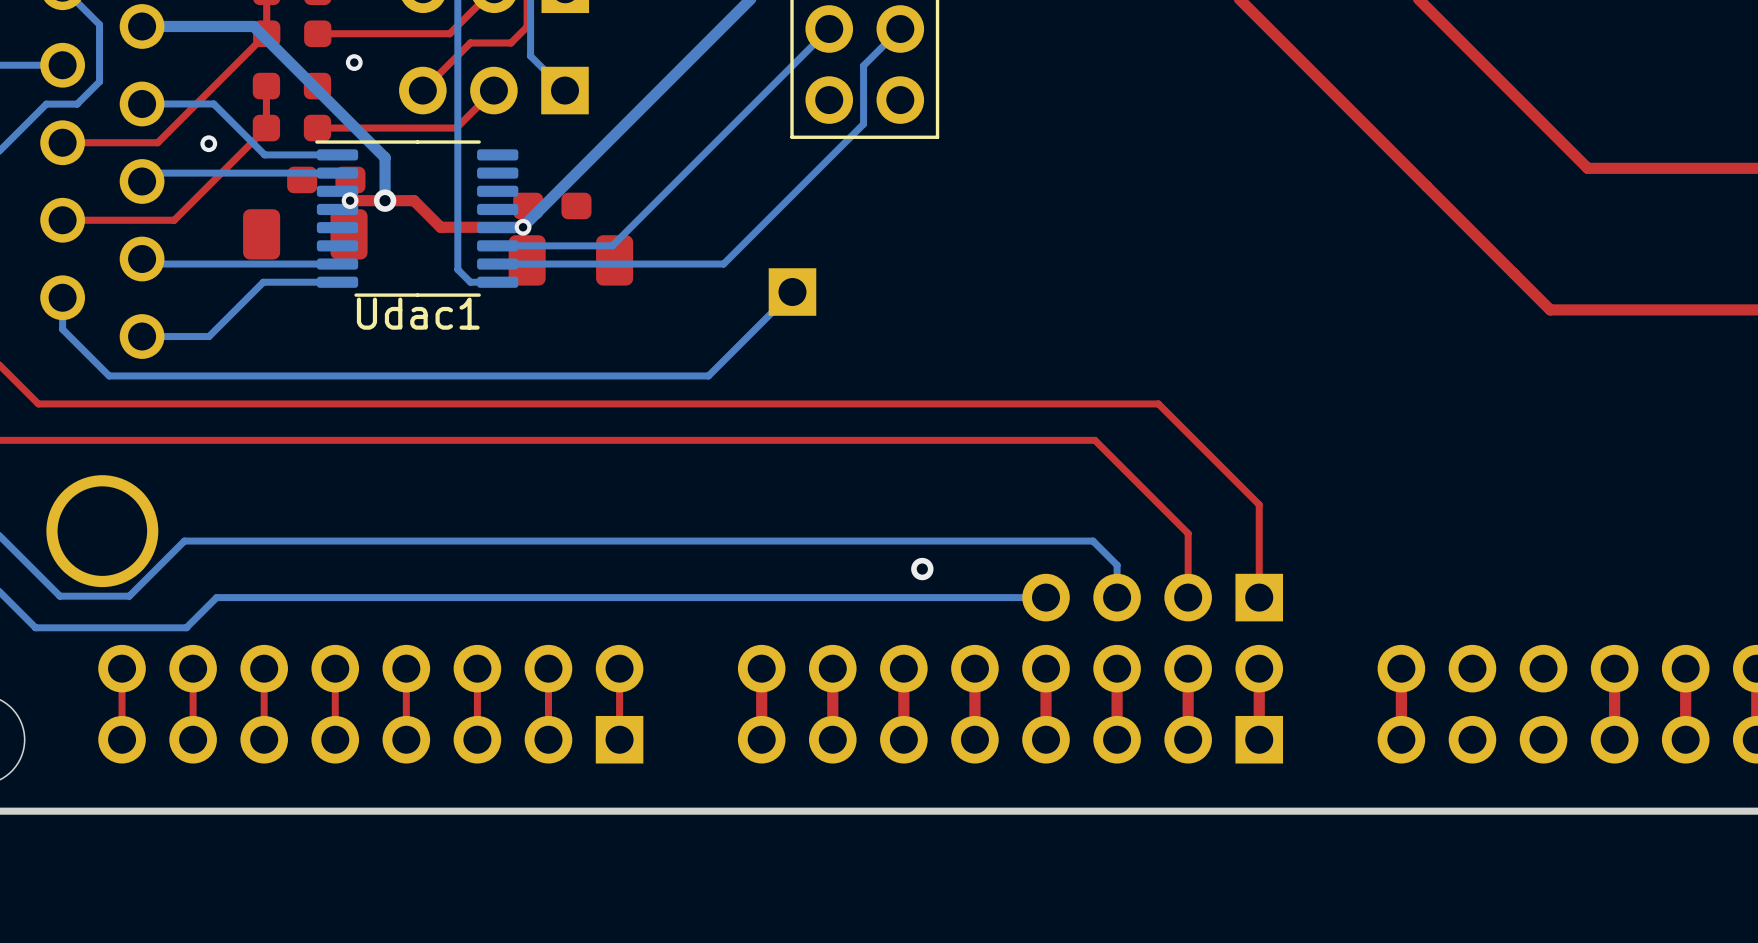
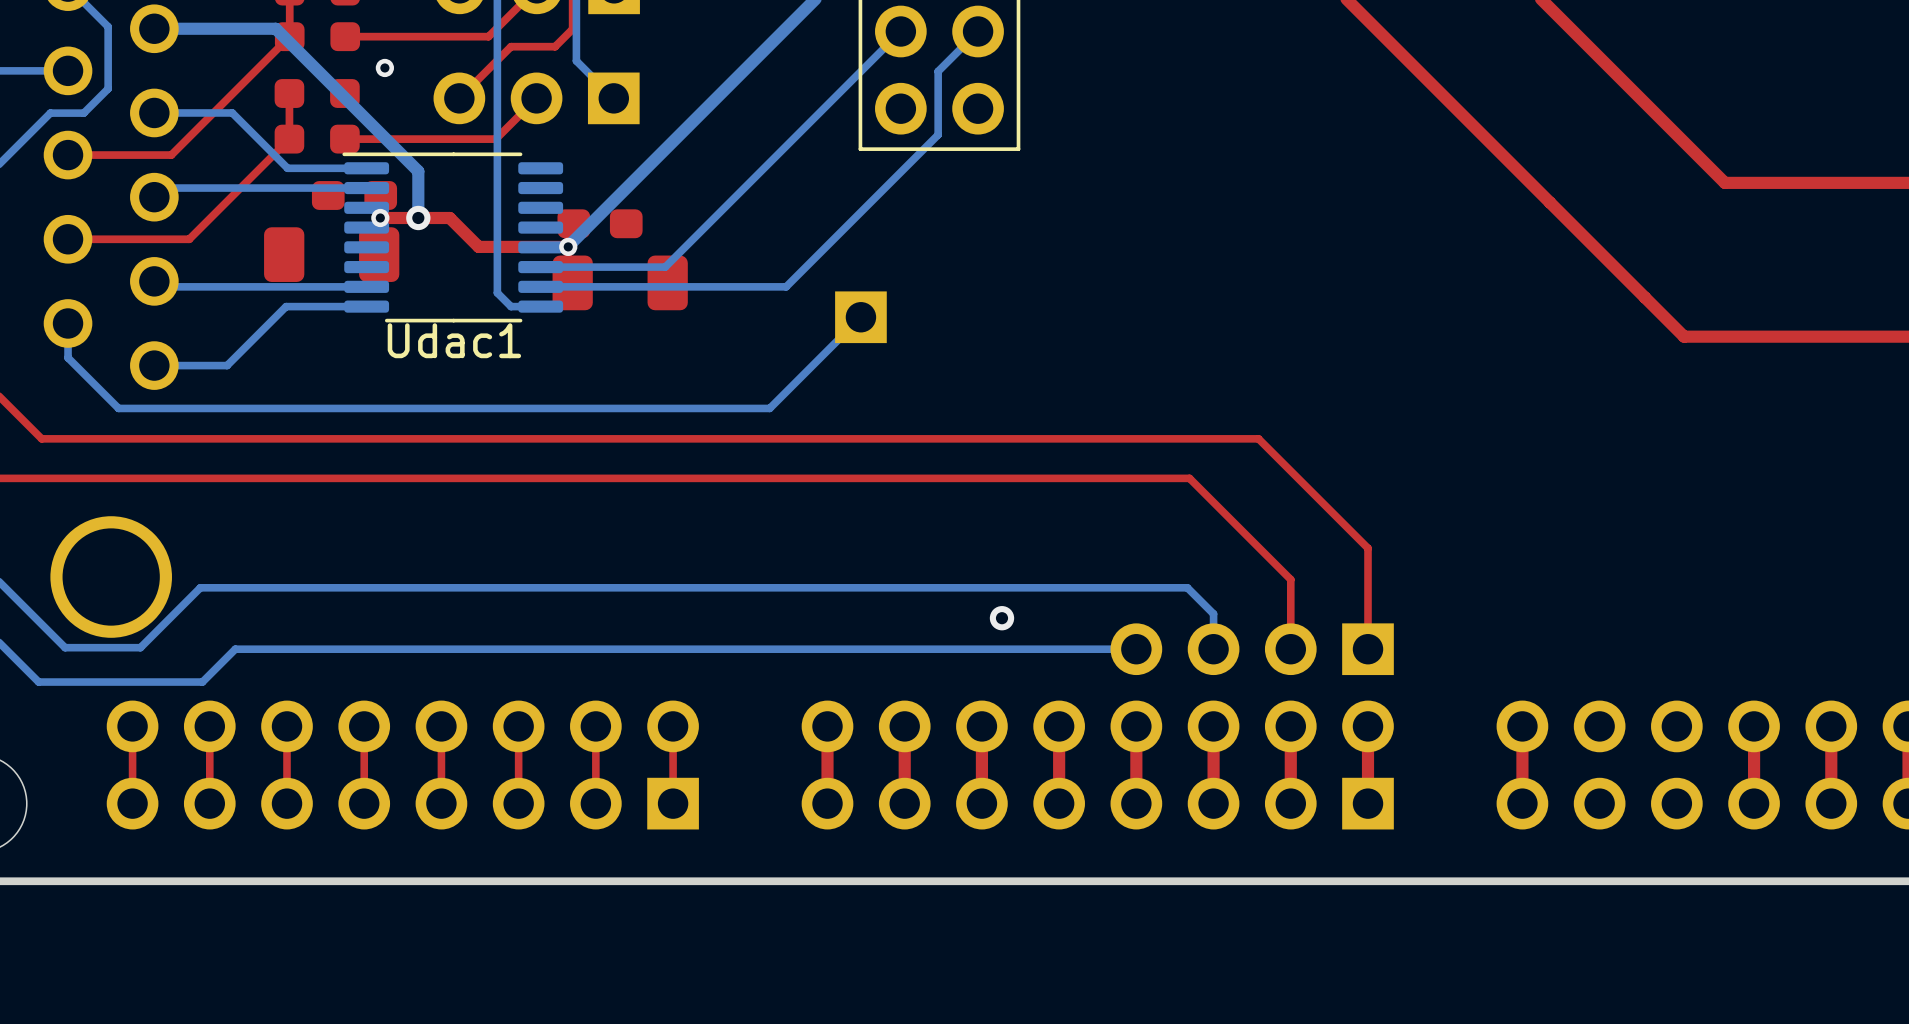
via: (208, 143) -> none

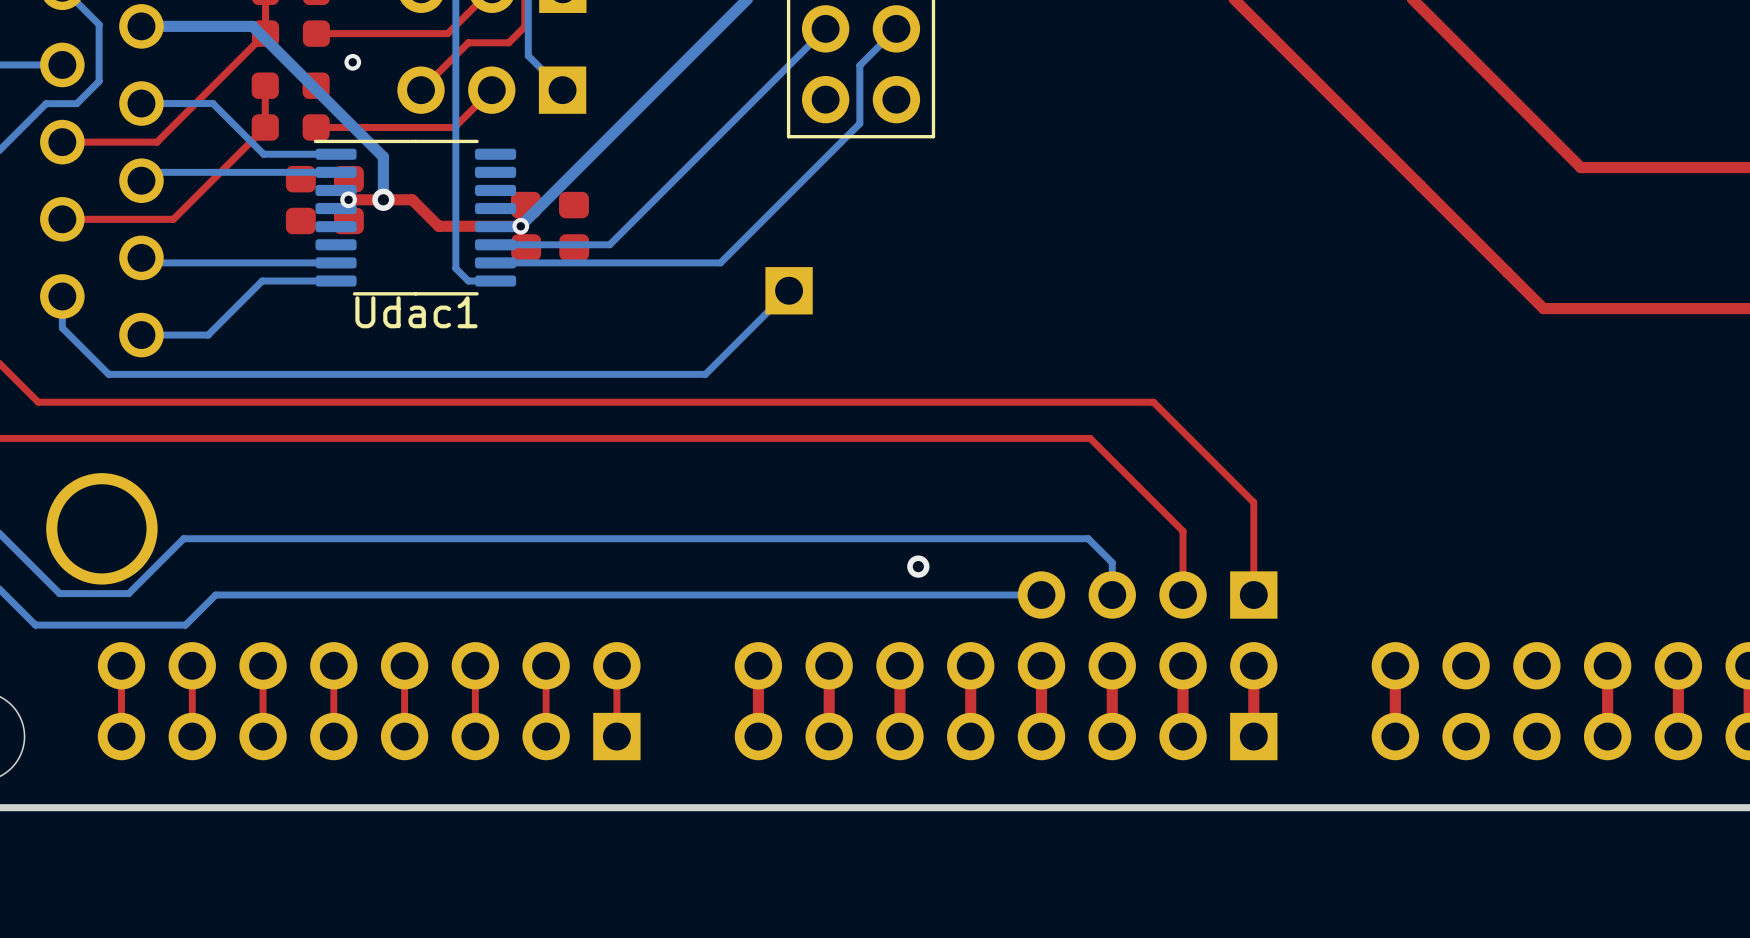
part footprint: [264, 227, 400, 282] -> [285, 207, 364, 235]
part footprint: [552, 255, 688, 311] -> [511, 234, 590, 261]

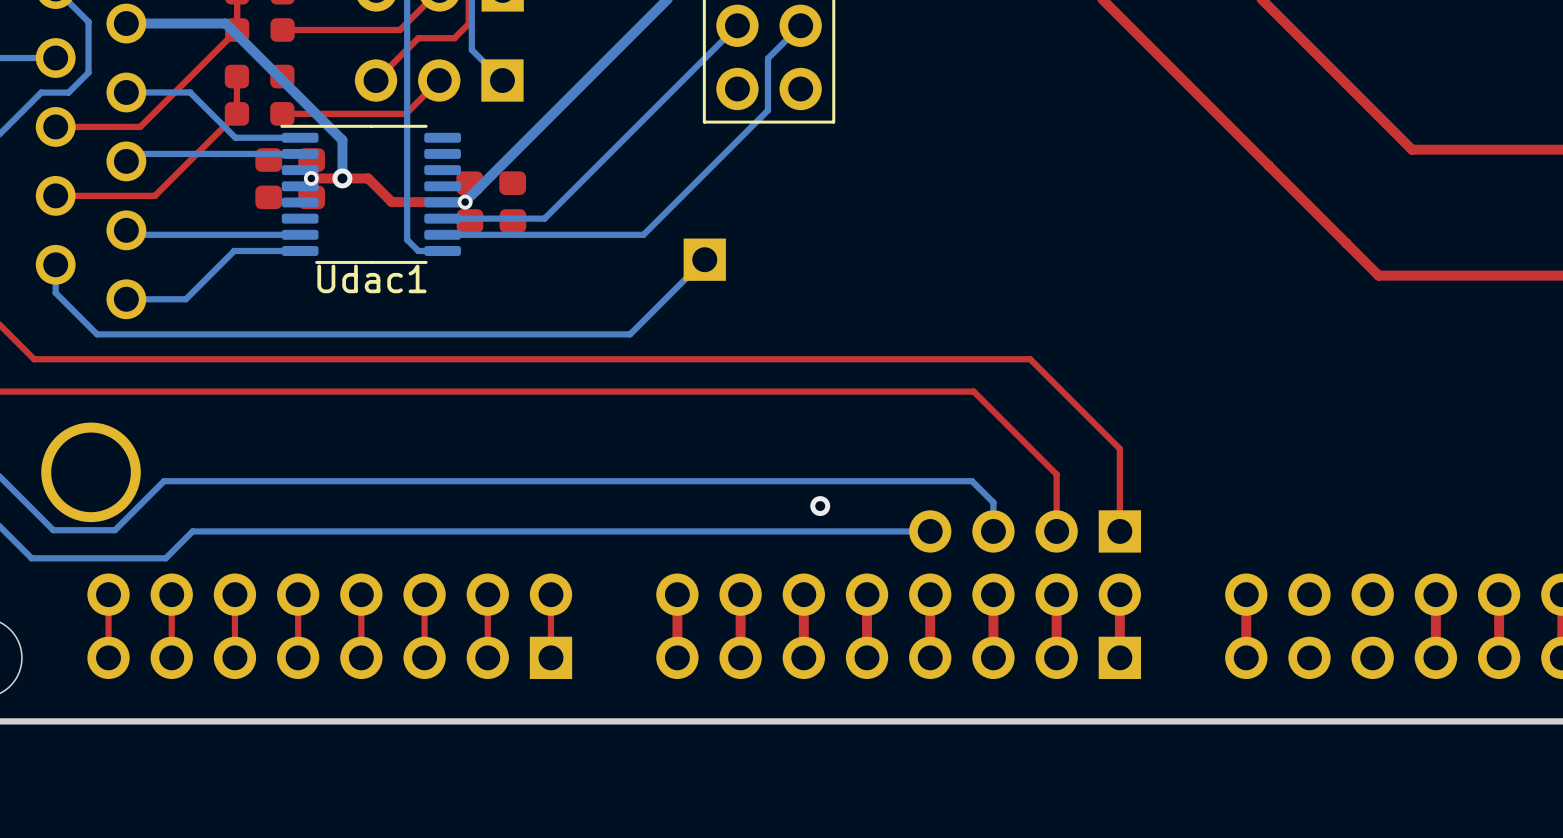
via: (352, 62) -> none

